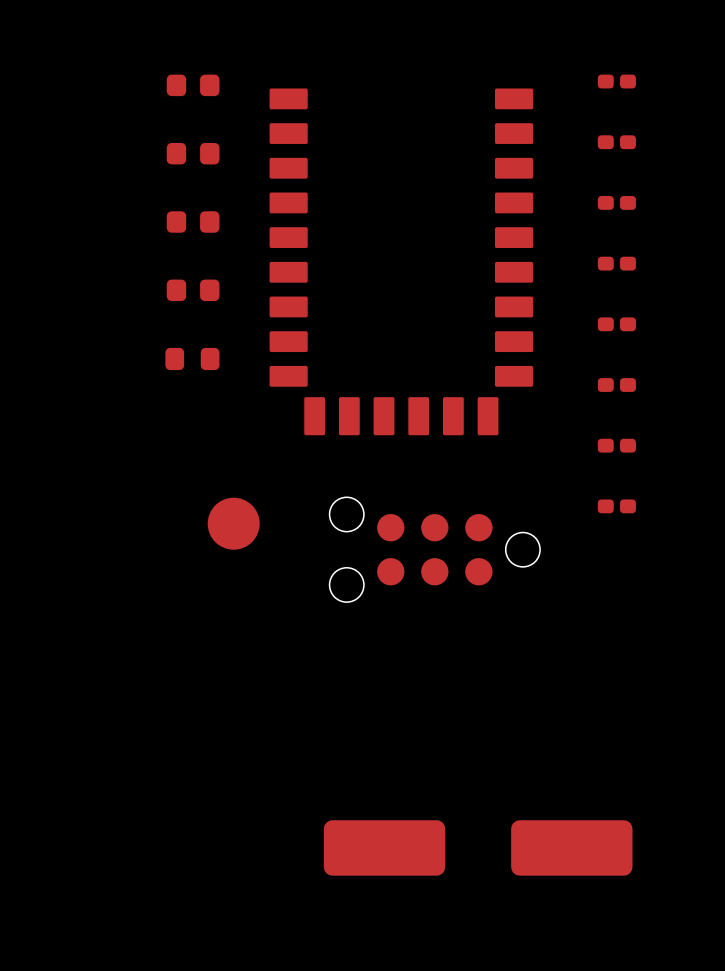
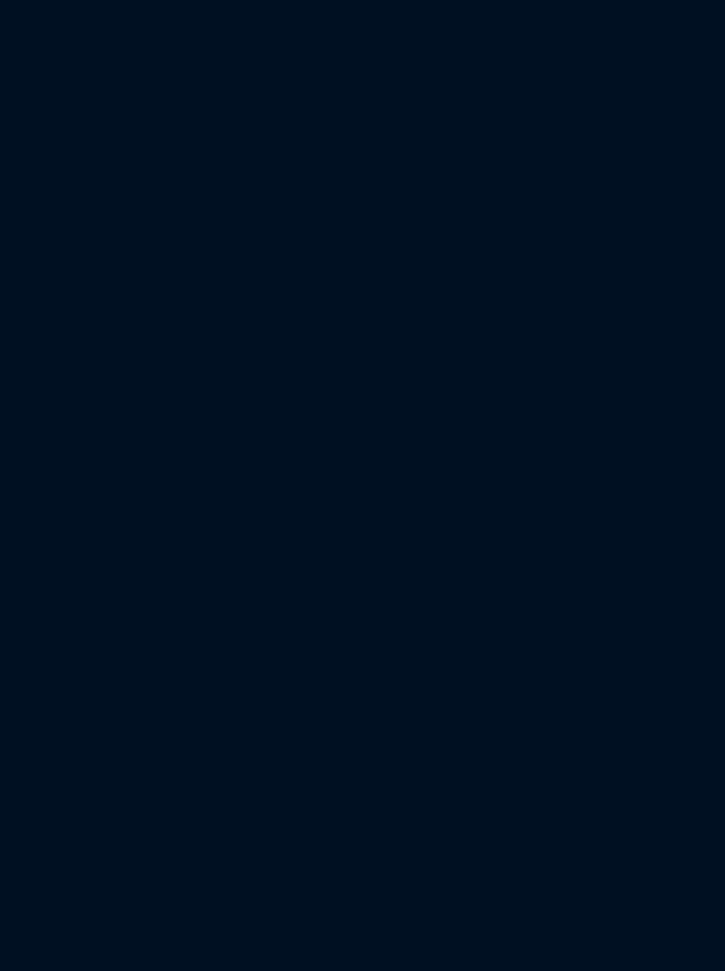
part: (616, 81) -> none
part: (193, 85) -> none
part: (616, 142) -> none
part: (193, 153) -> none
part: (616, 202) -> none
part: (193, 221) -> none
part: (401, 261) -> none
part: (616, 263) -> none
part: (193, 290) -> none
part: (616, 324) -> none
part: (192, 358) -> none
part: (616, 384) -> none
part: (616, 445) -> none
part: (616, 506) -> none
part: (233, 523) -> none
part: (434, 549) -> none
part: (478, 847) -> none

